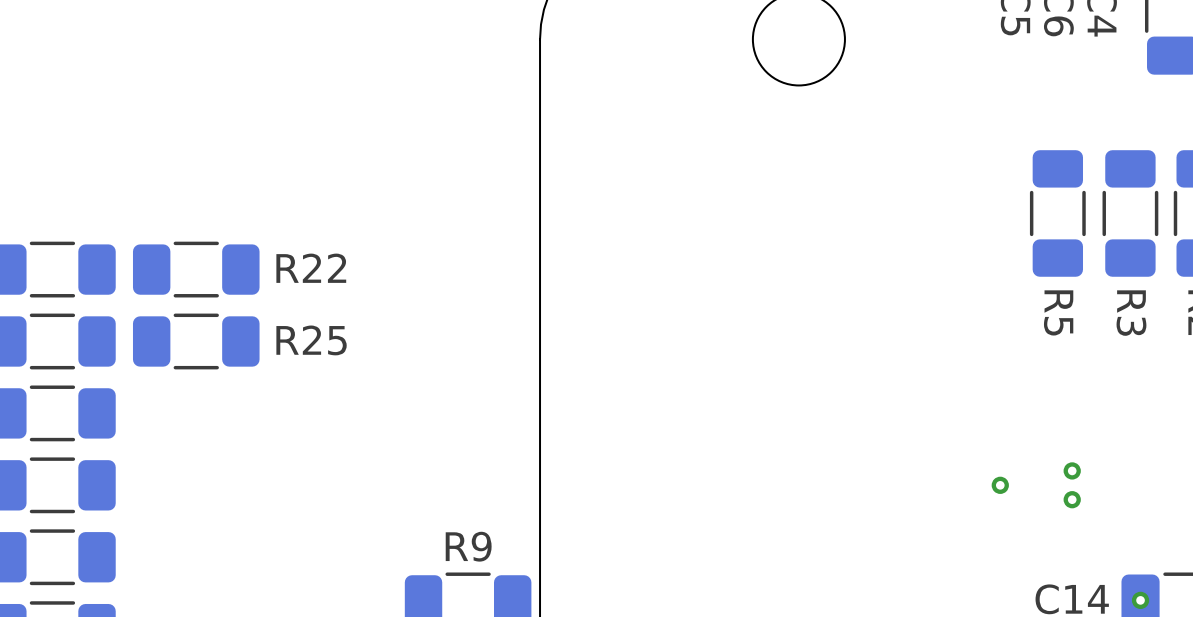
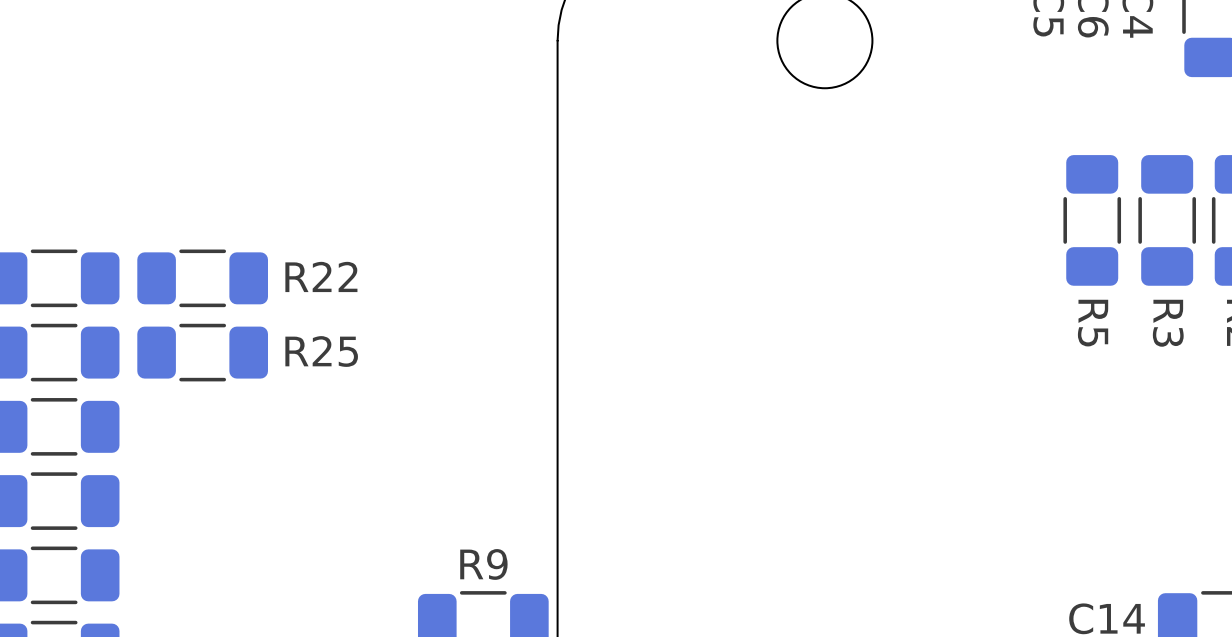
via: (1072, 470) -> none
via: (1000, 485) -> none
via: (1072, 499) -> none
via: (1140, 600) -> none

